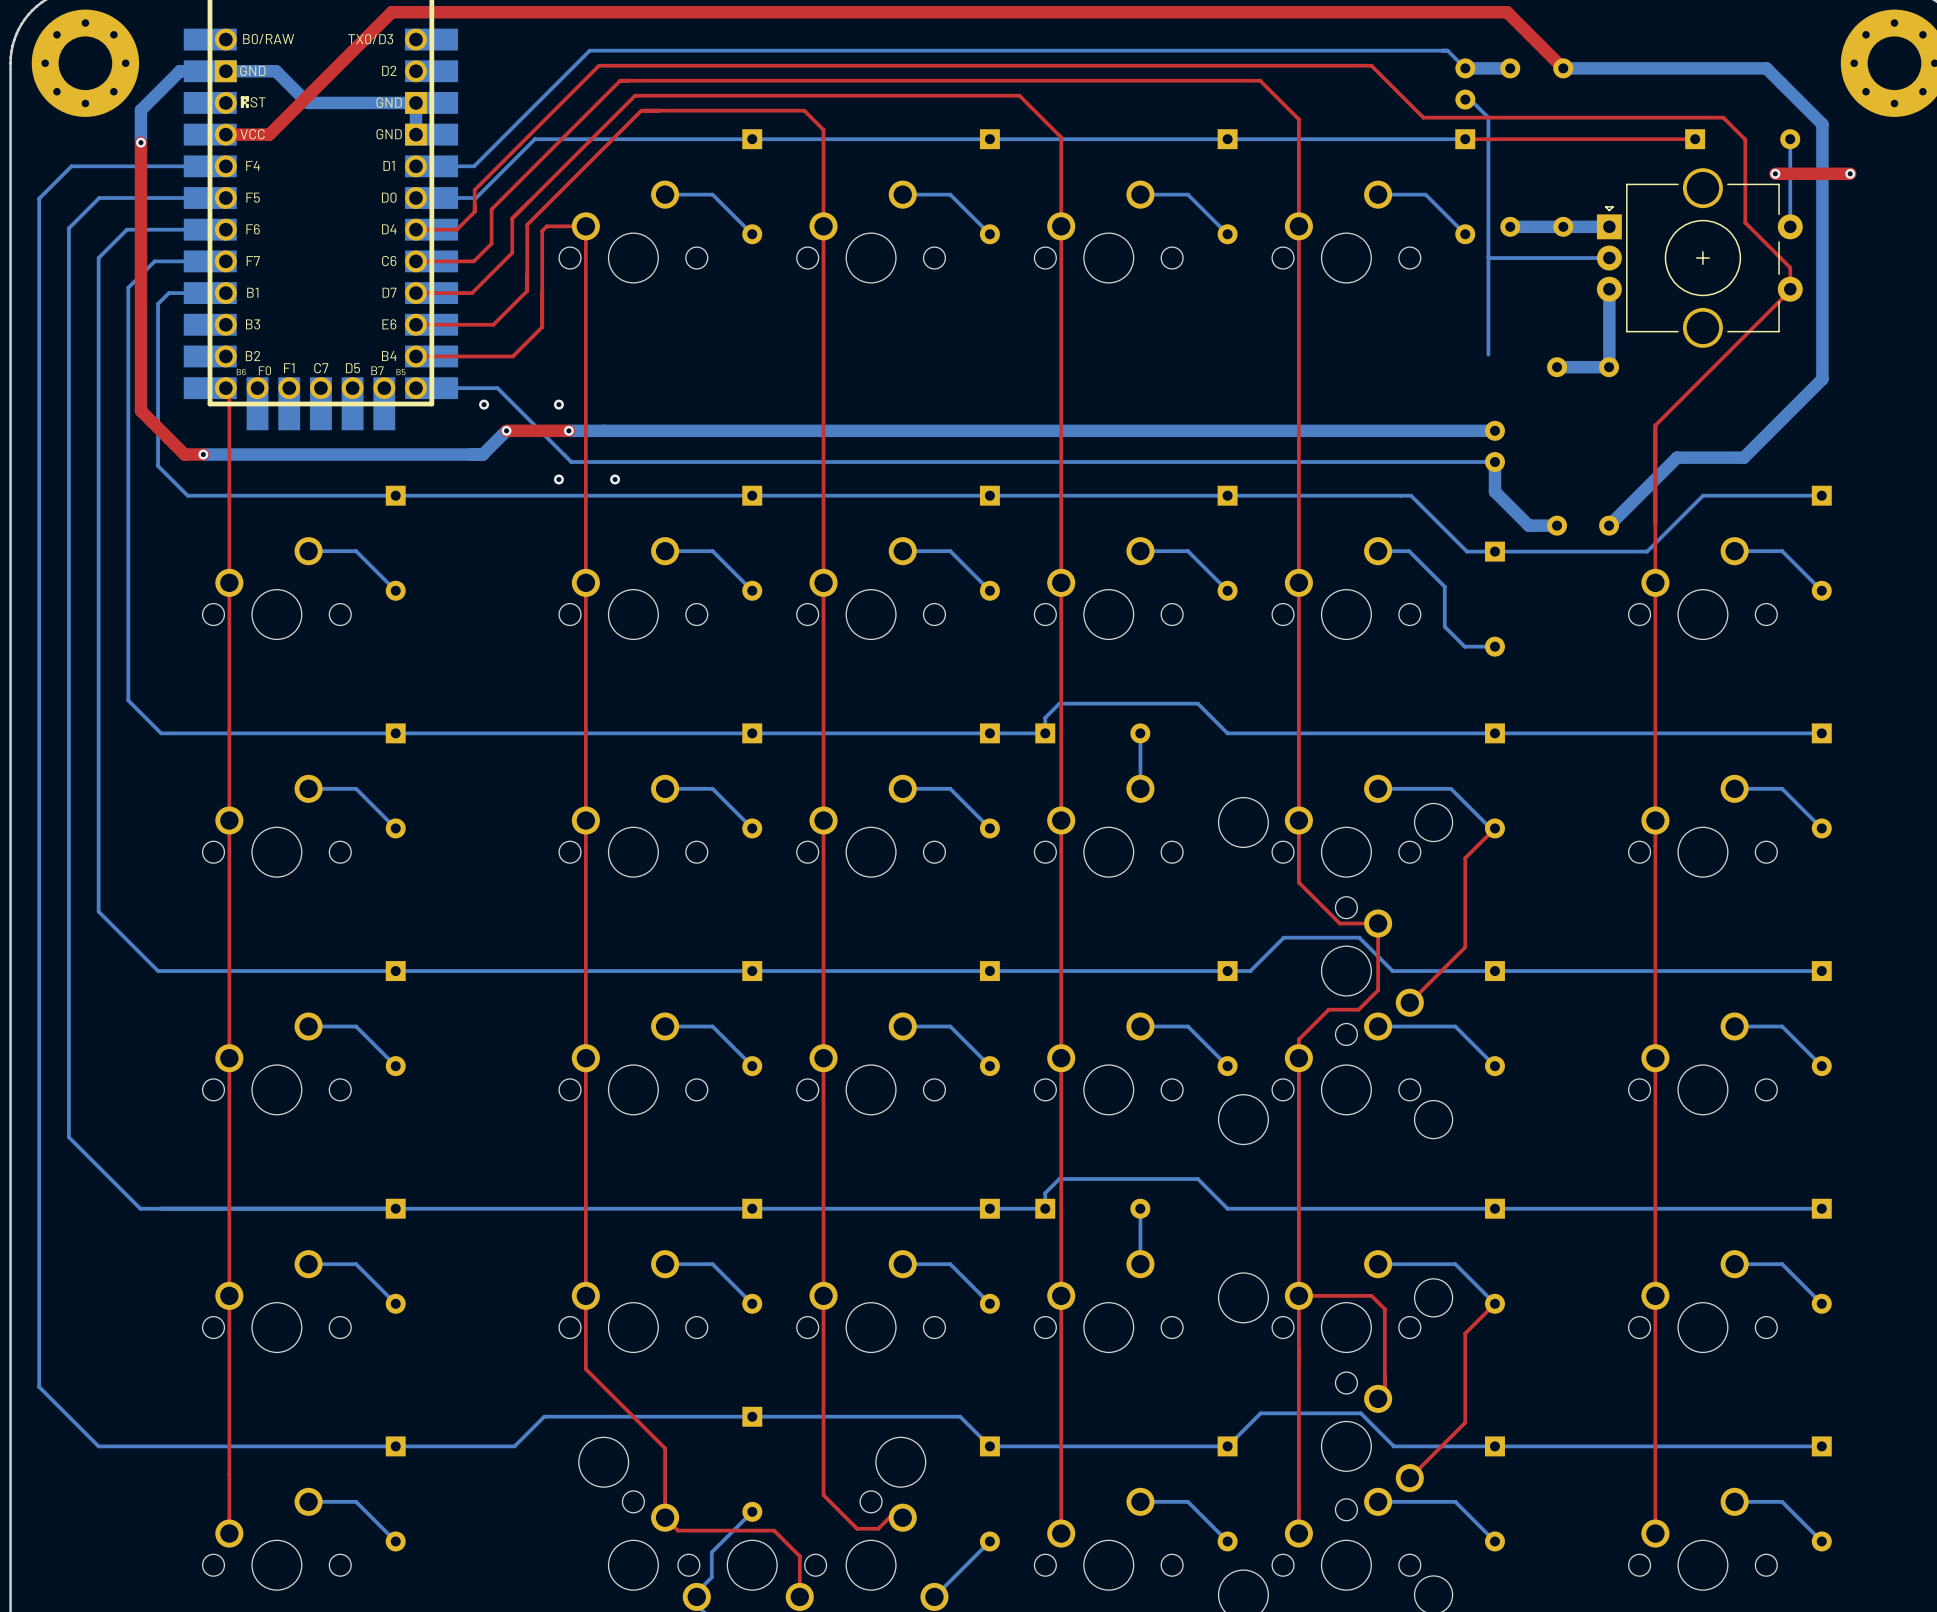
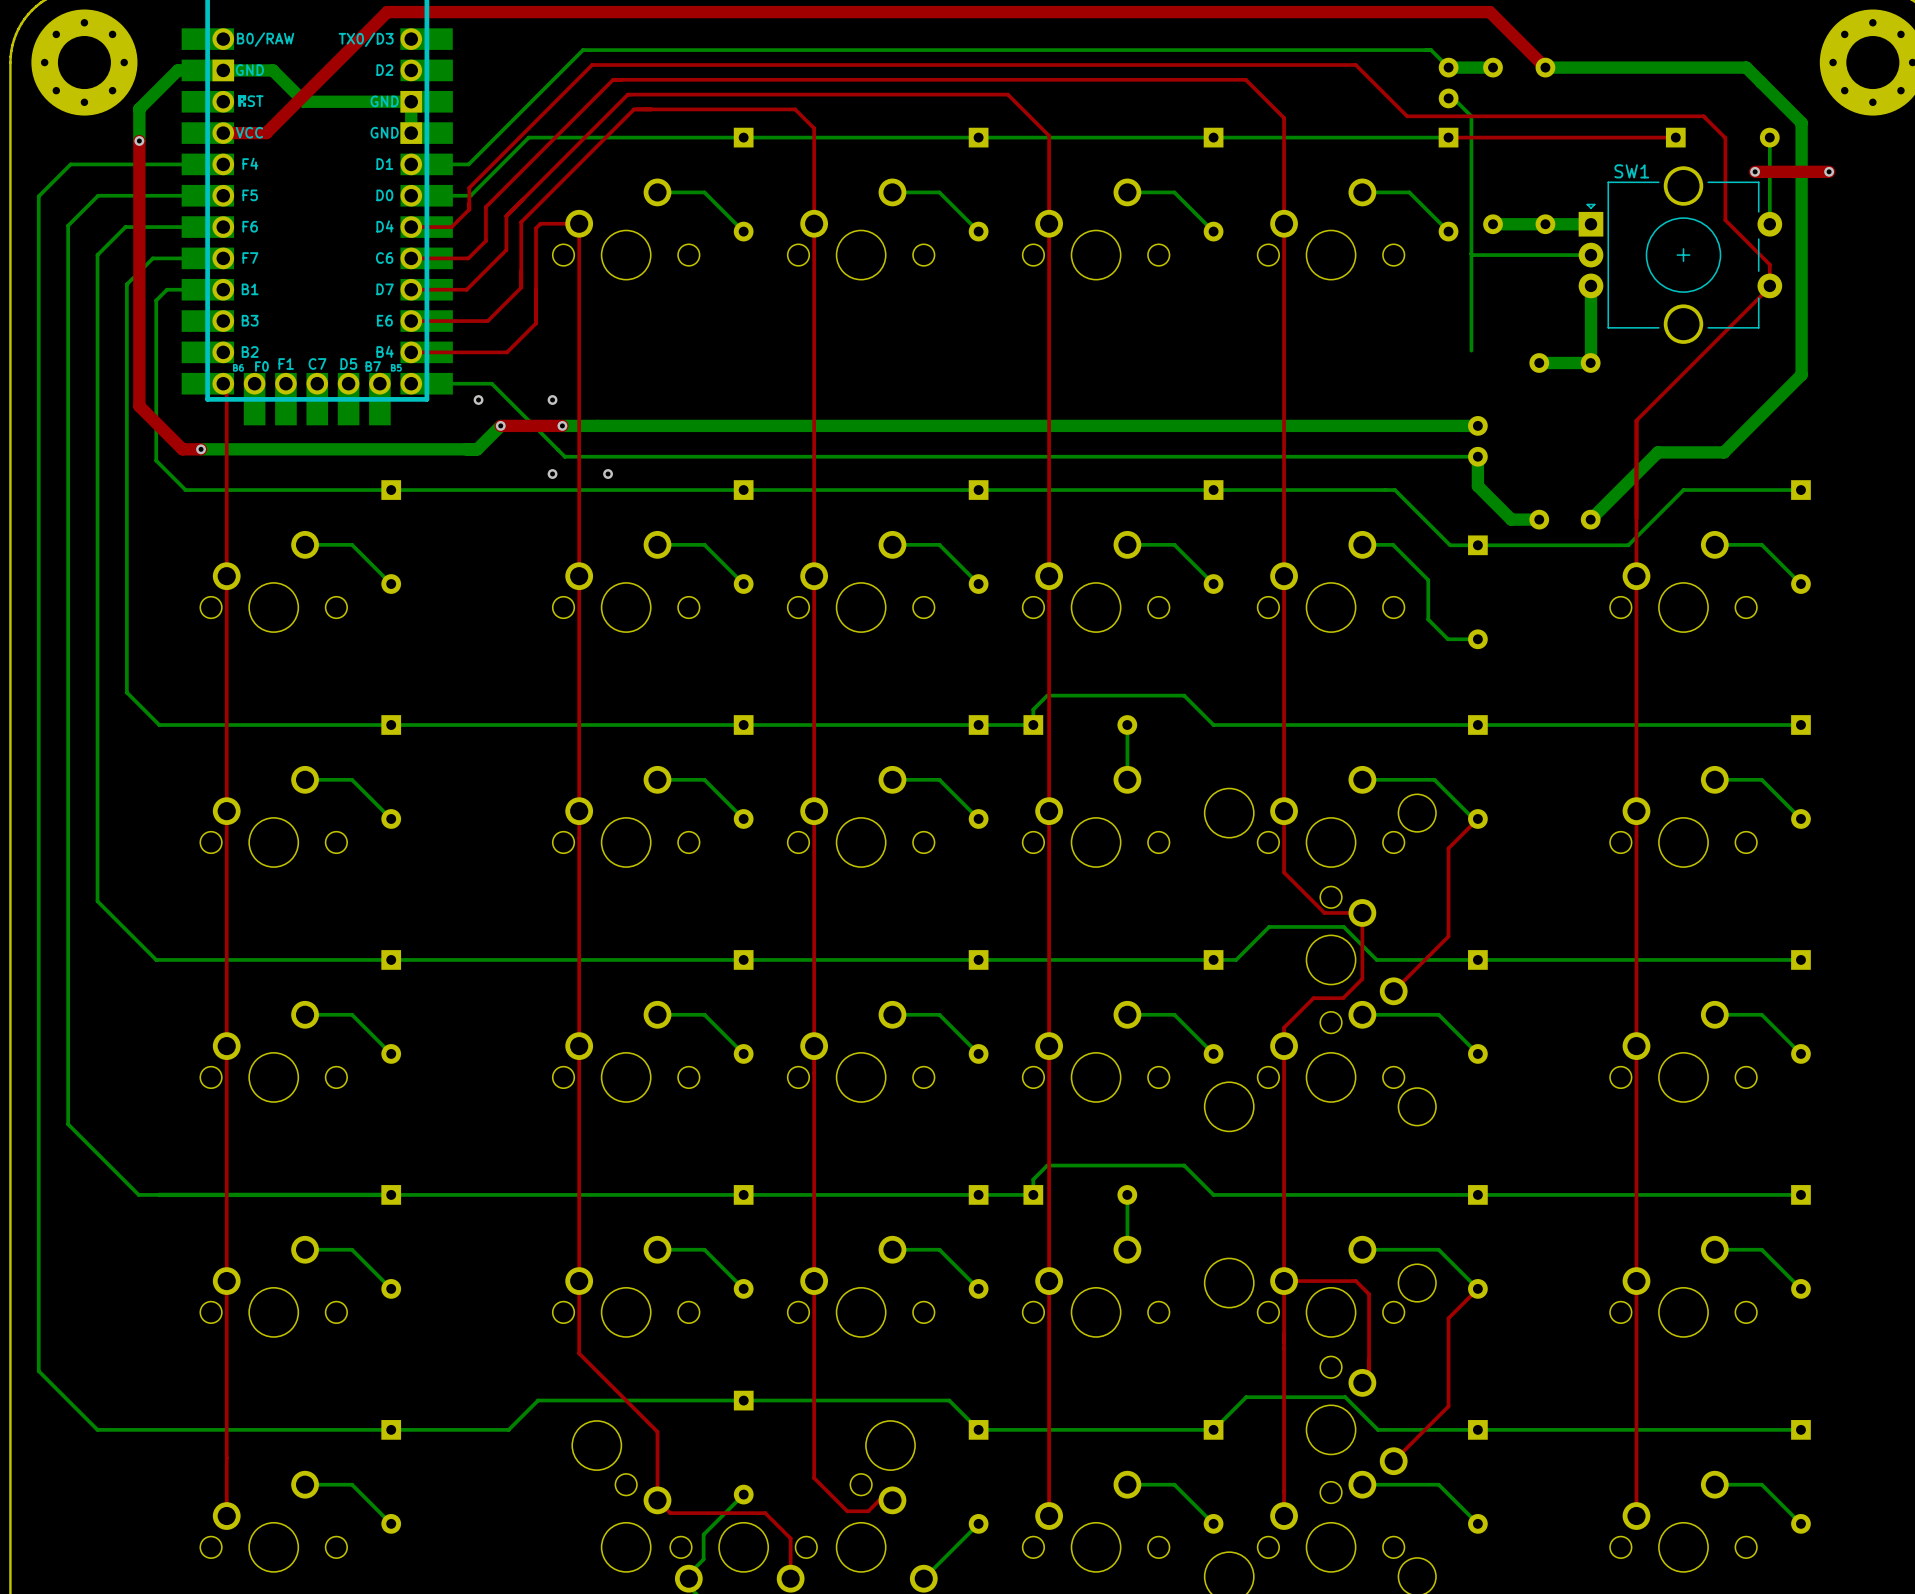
SW1 name: none -> SW1 (1631, 171)

